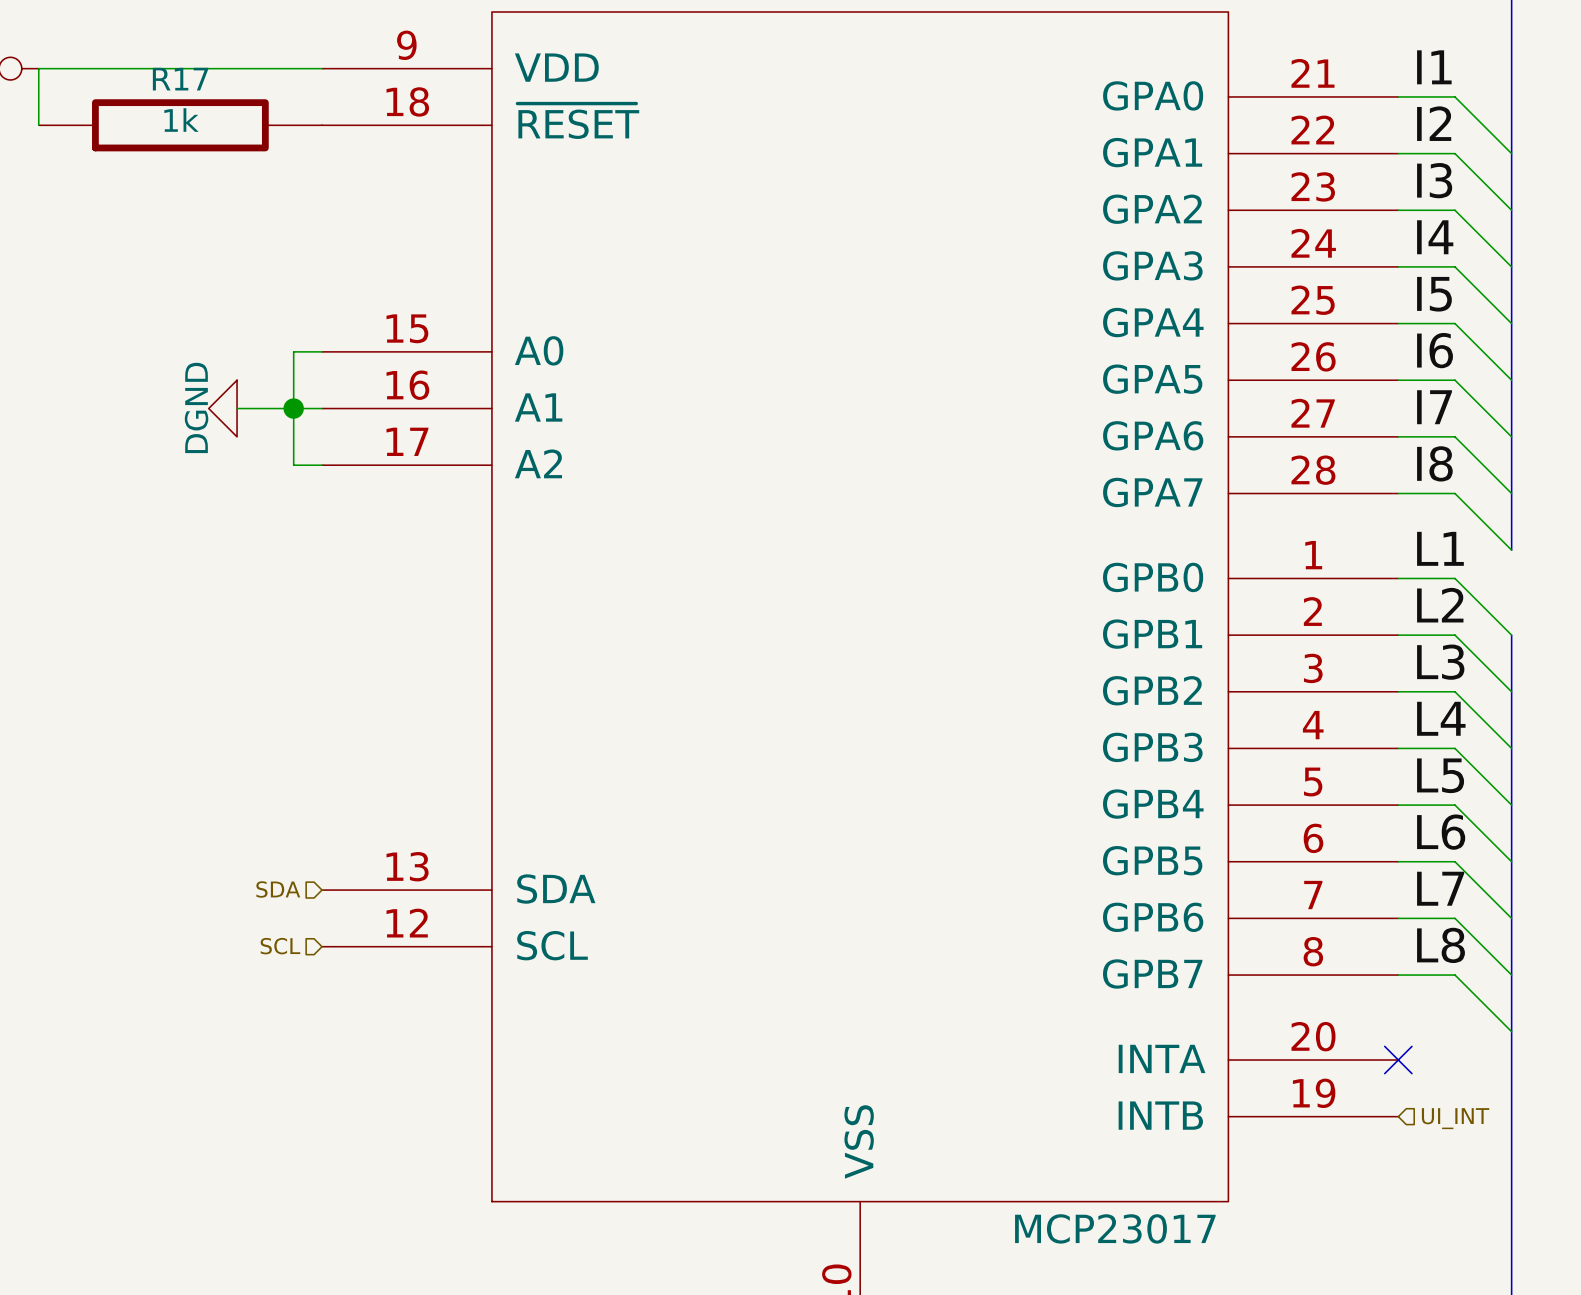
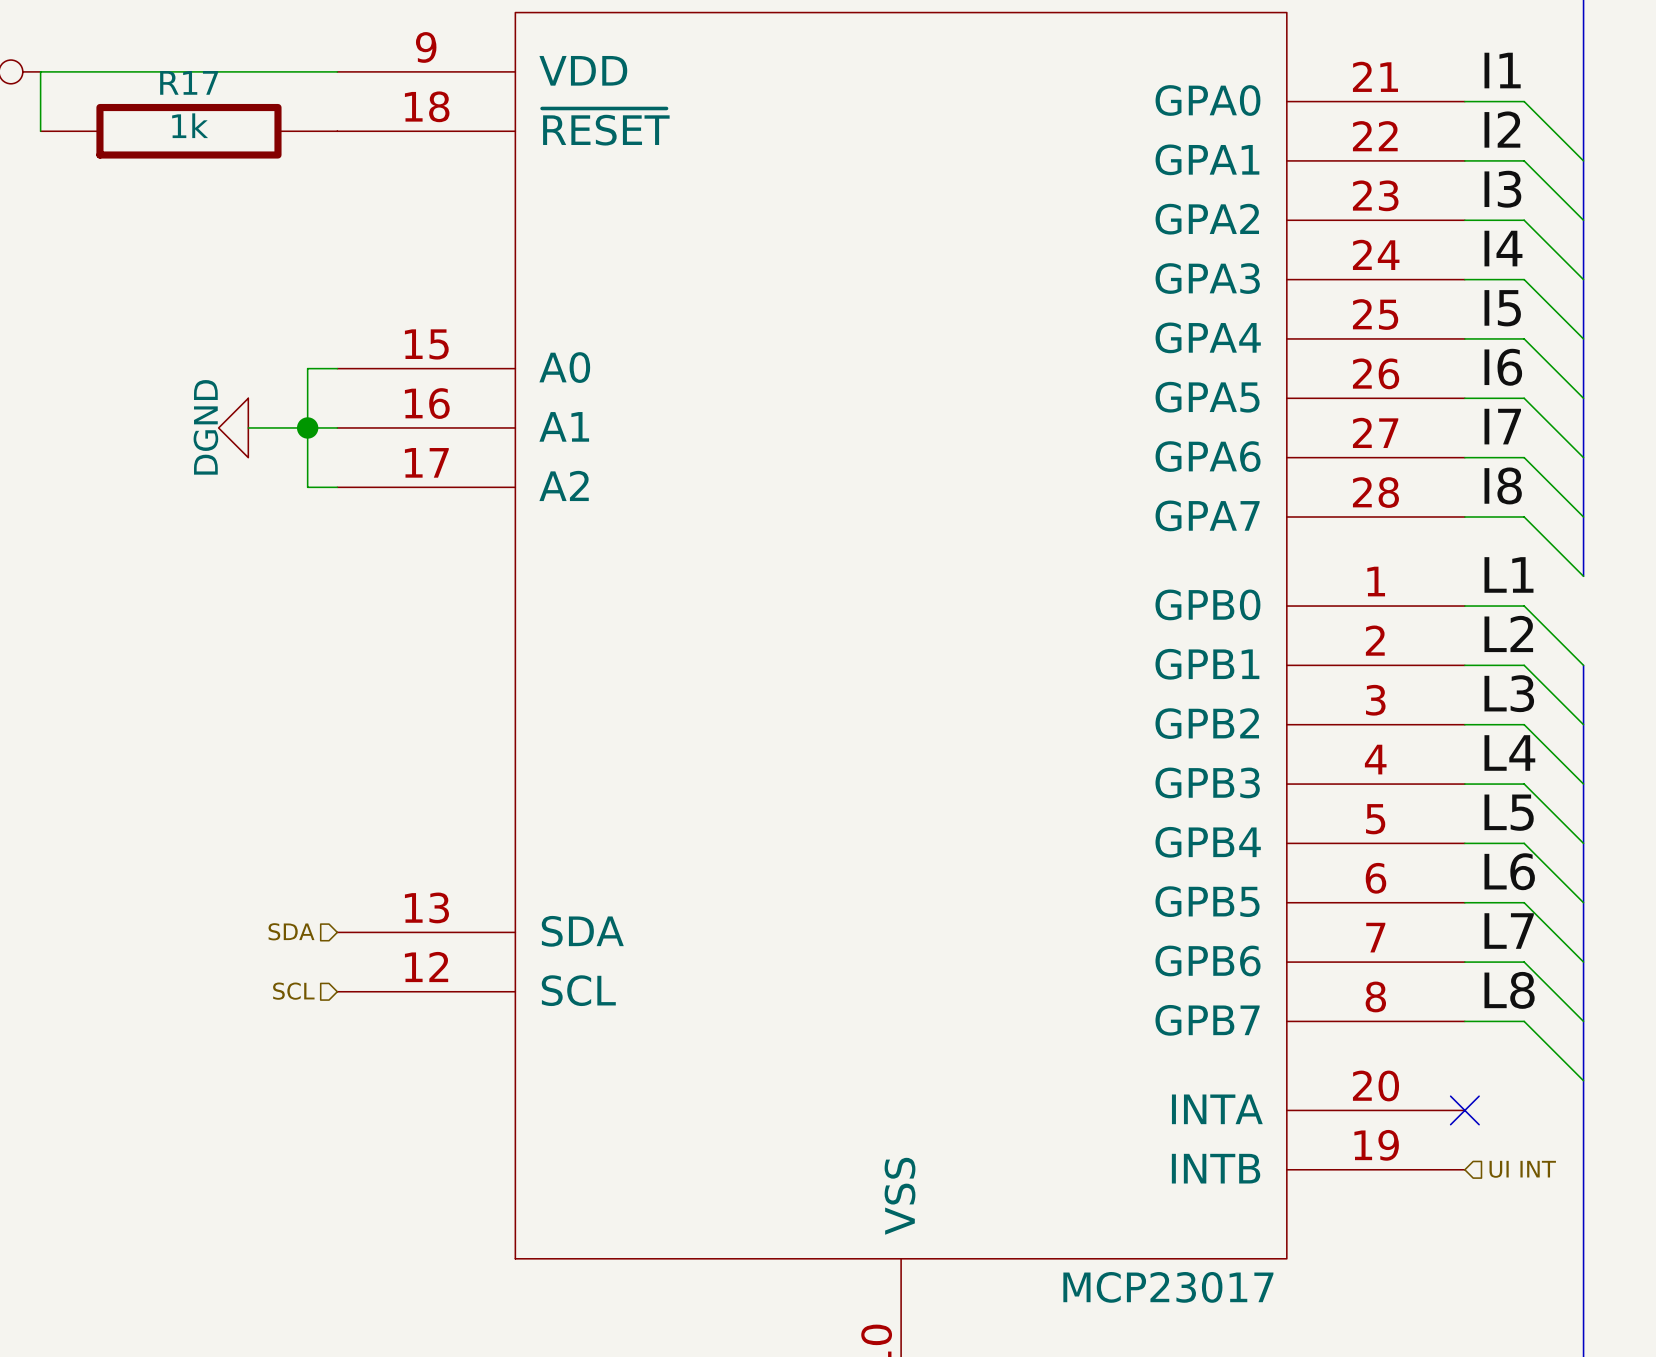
hierarchical label: UI_INT (1455, 1118) -> UI INT (1522, 1169)

